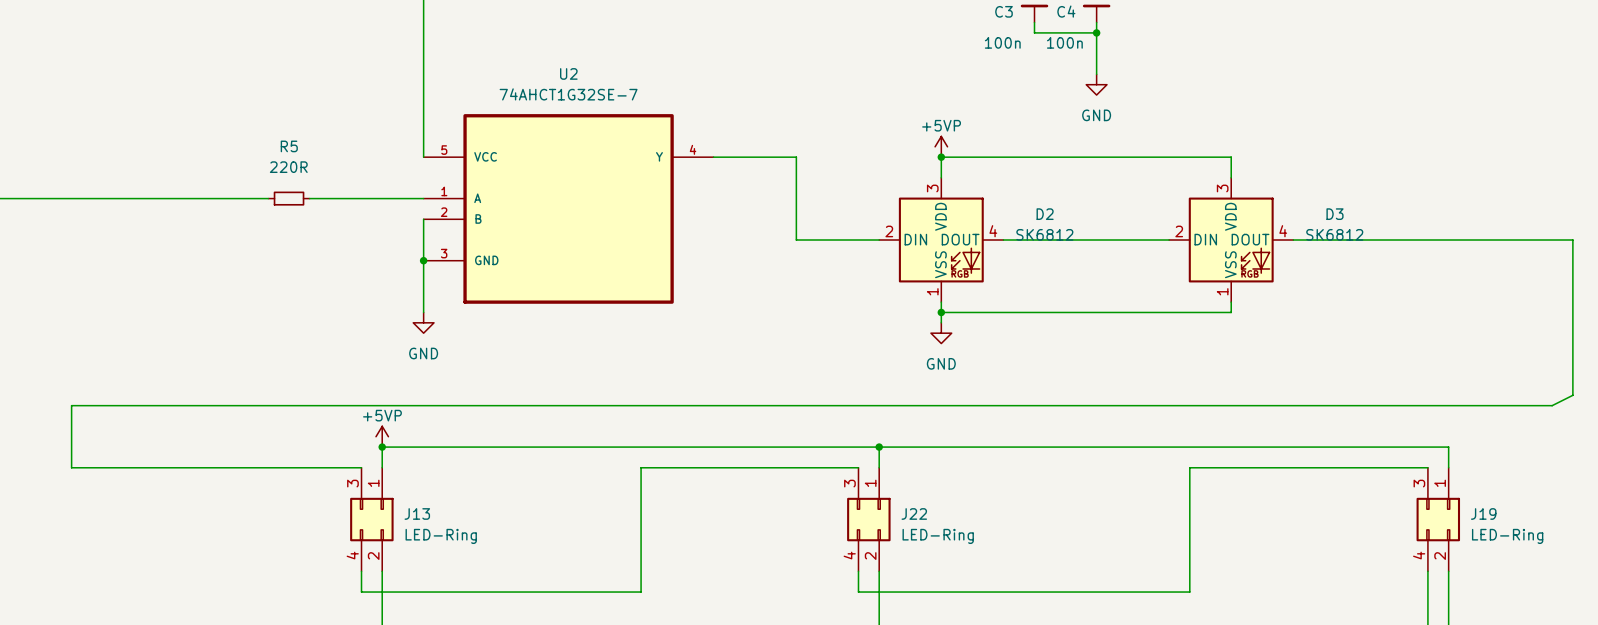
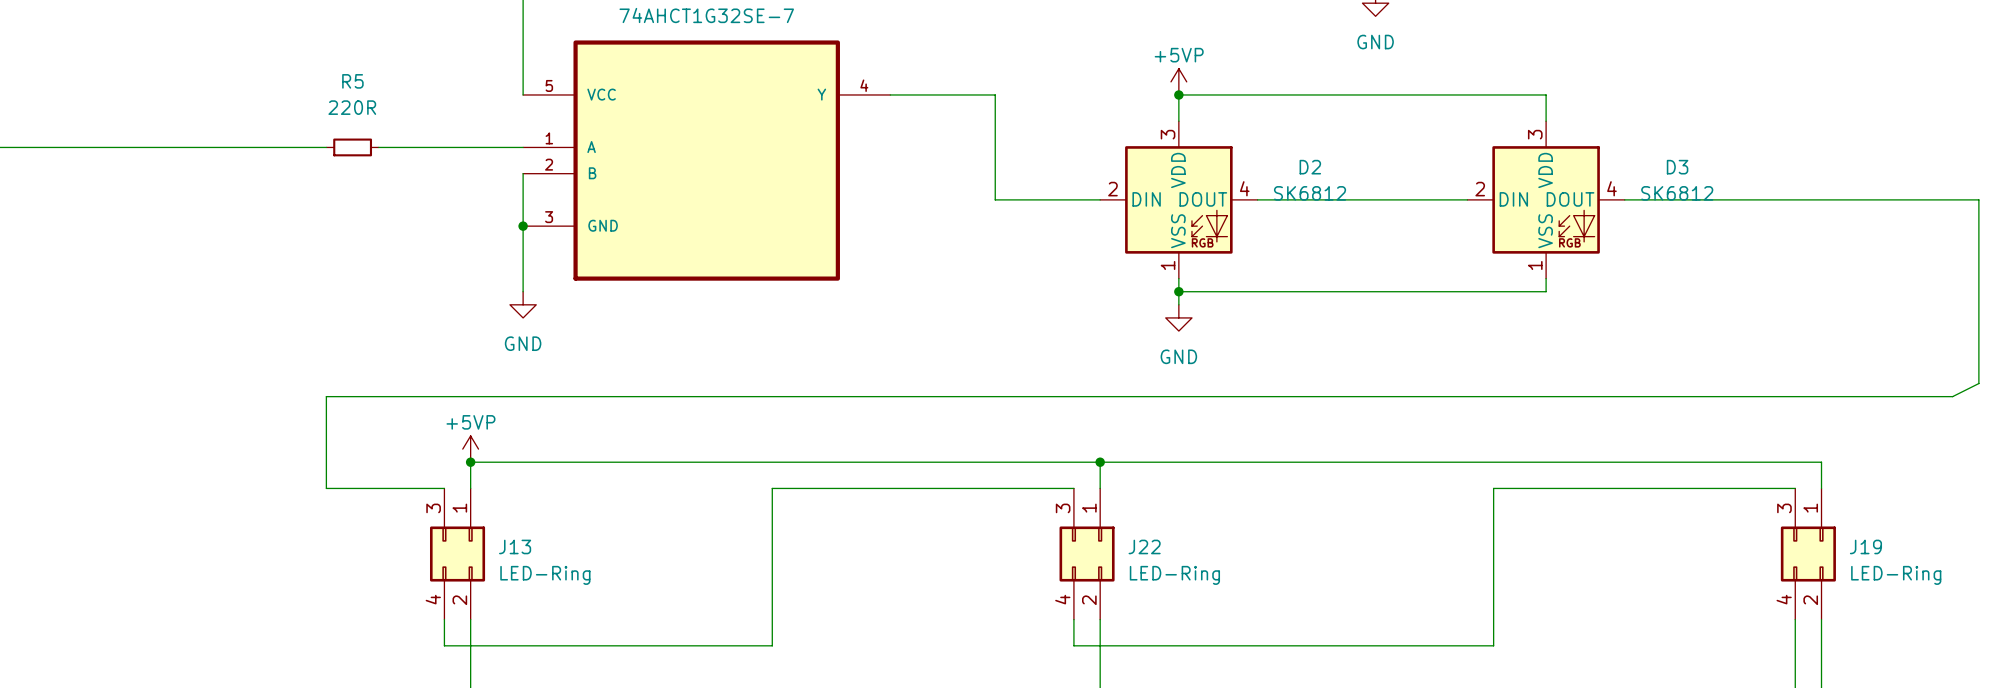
wire: (1572, 384) (1572, 395) (1552, 405) (71, 405) (71, 467) (268, 467) -> (1978, 383) (1952, 396) (326, 396) (326, 488)
wire: (641, 467) (641, 592) (620, 592) -> (798, 488) (772, 488) (772, 645)

